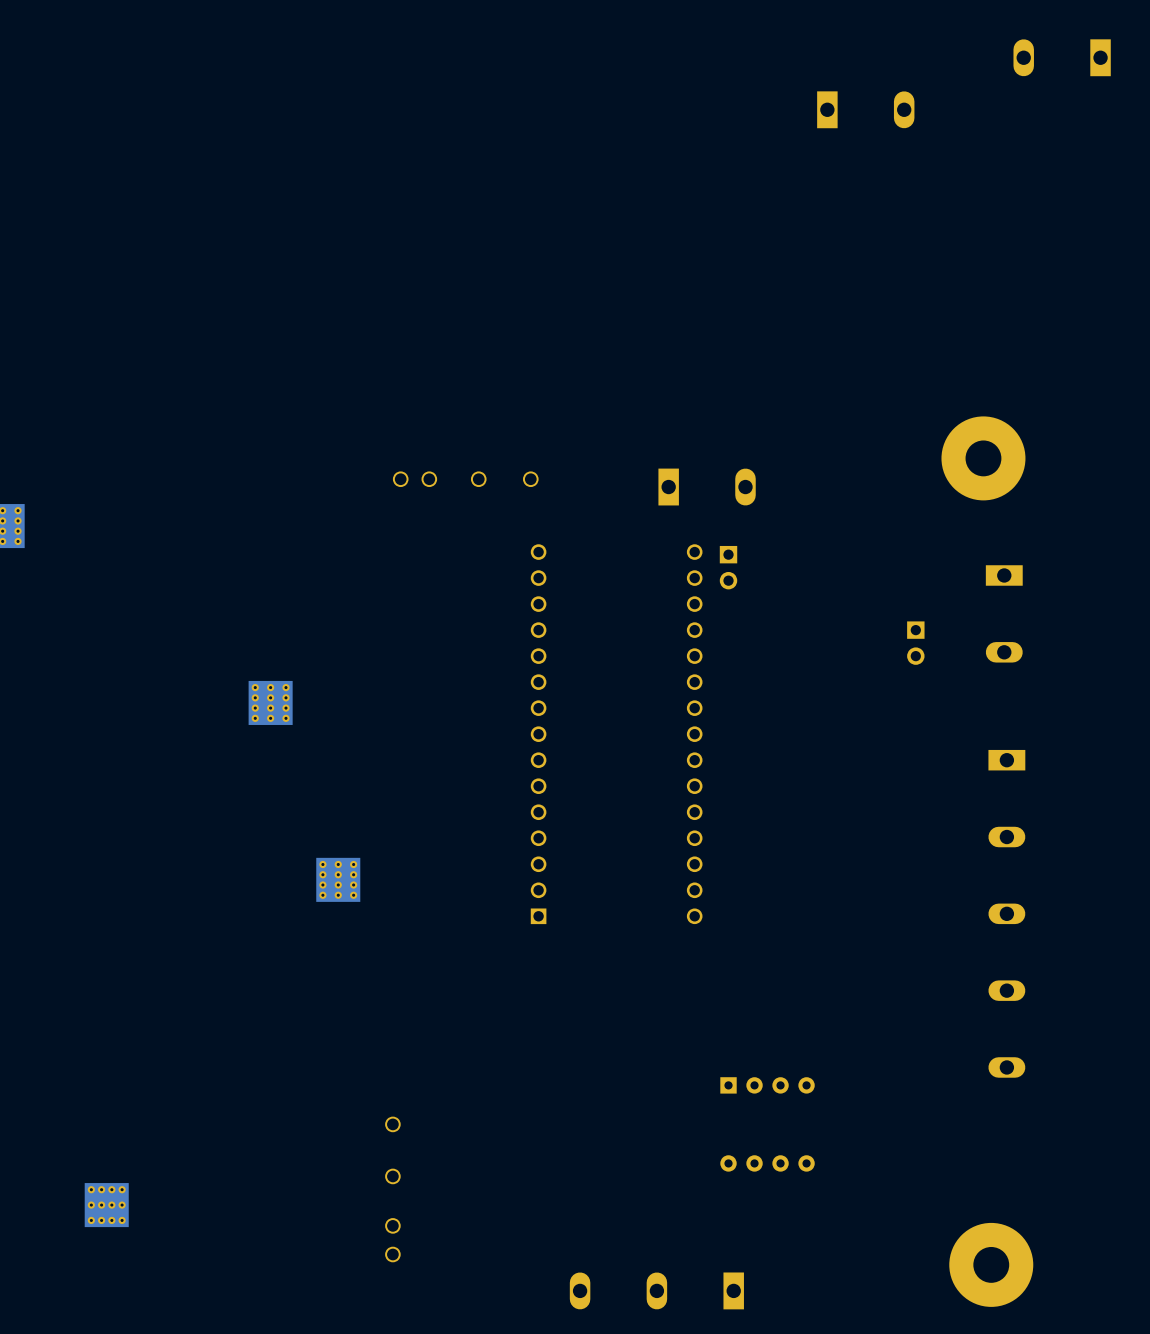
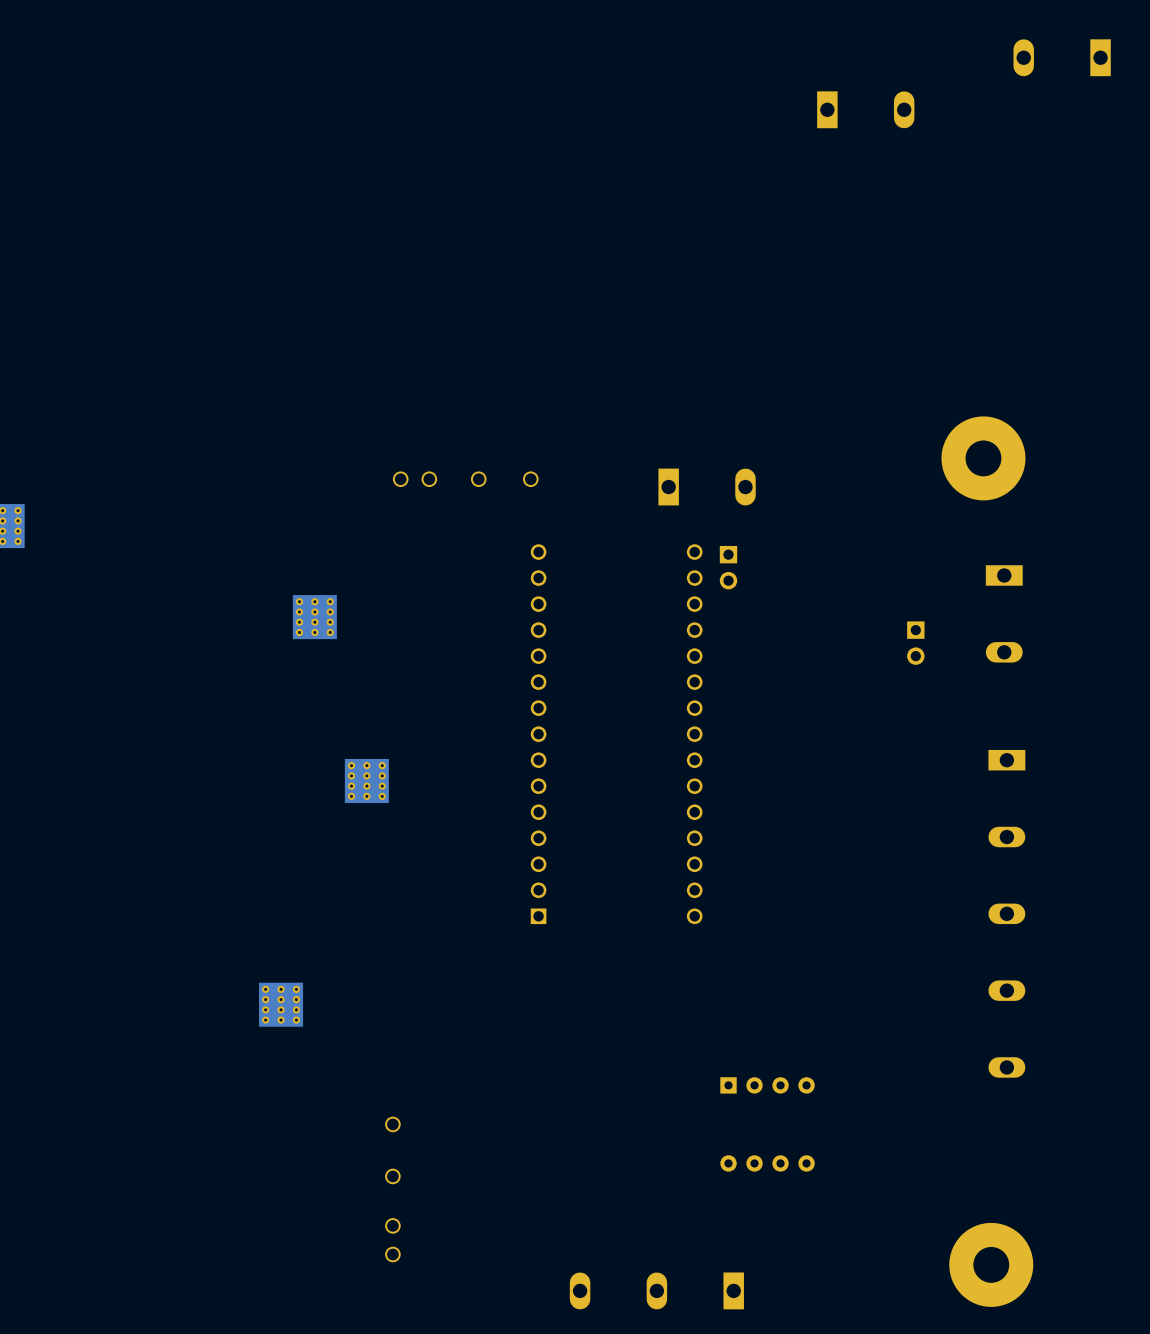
part: none -> (314, 617)
part: (270, 702) -> none
part: none -> (366, 781)
part: (338, 879) -> none
part: none -> (281, 1004)
part: (106, 1205) -> none

